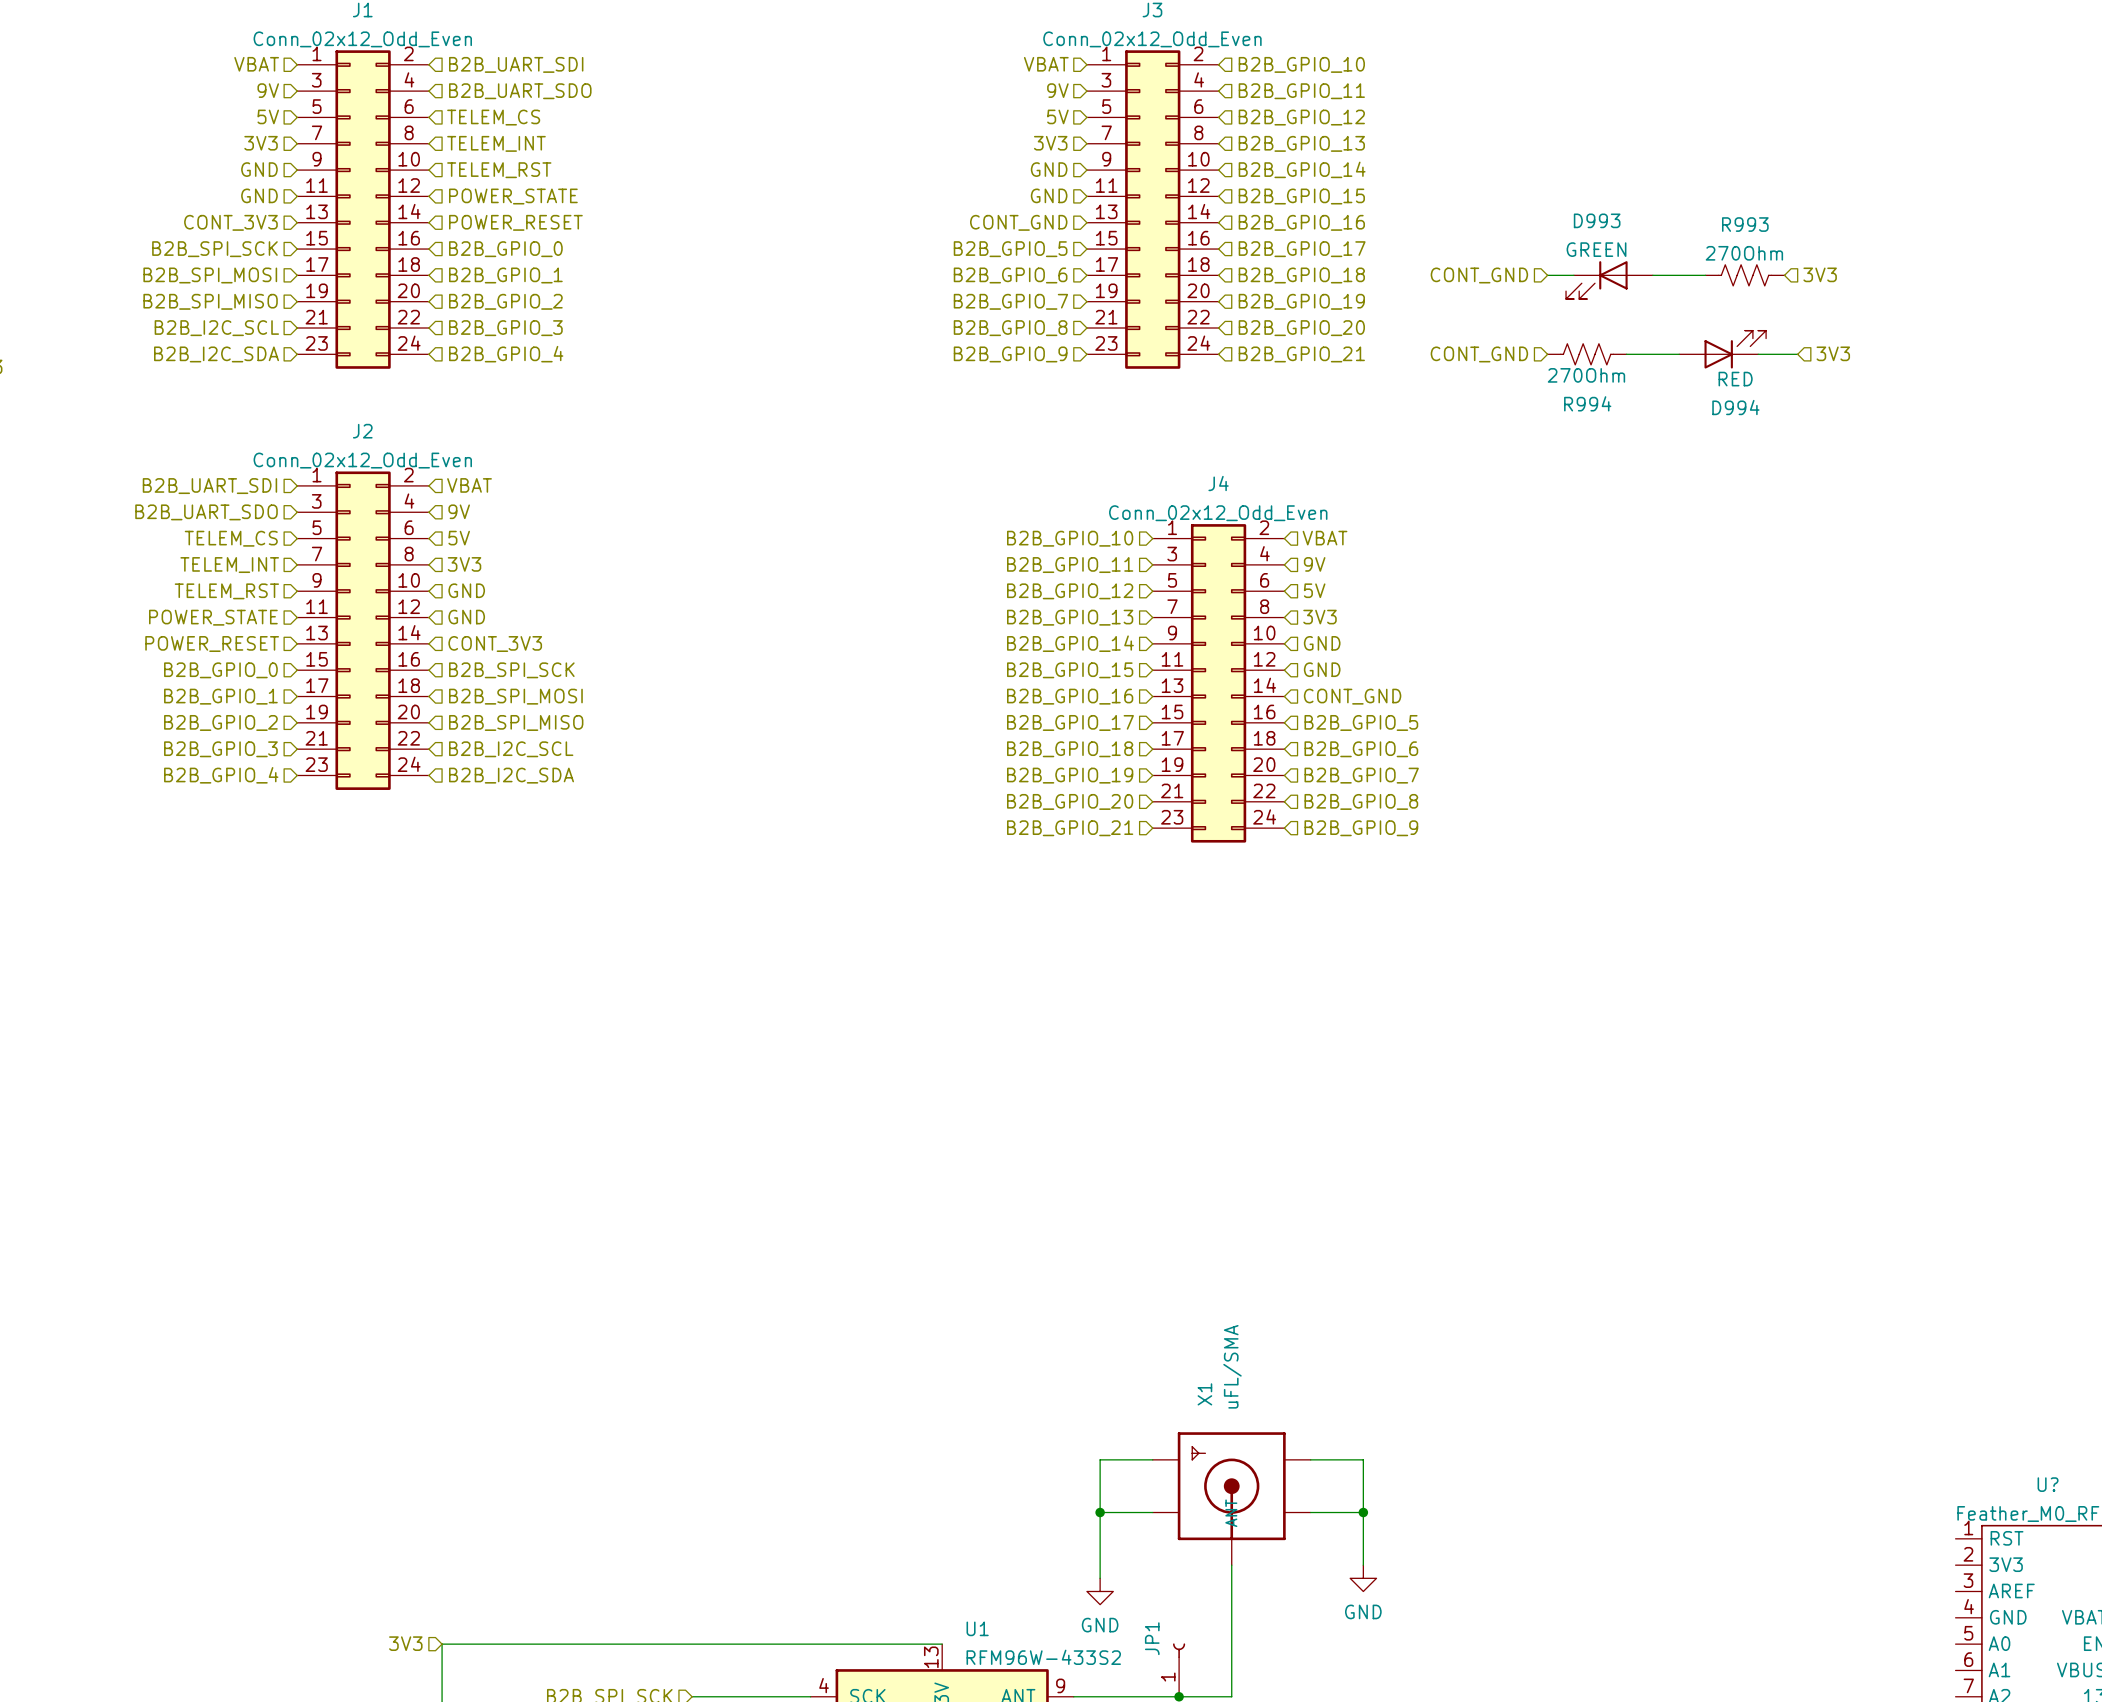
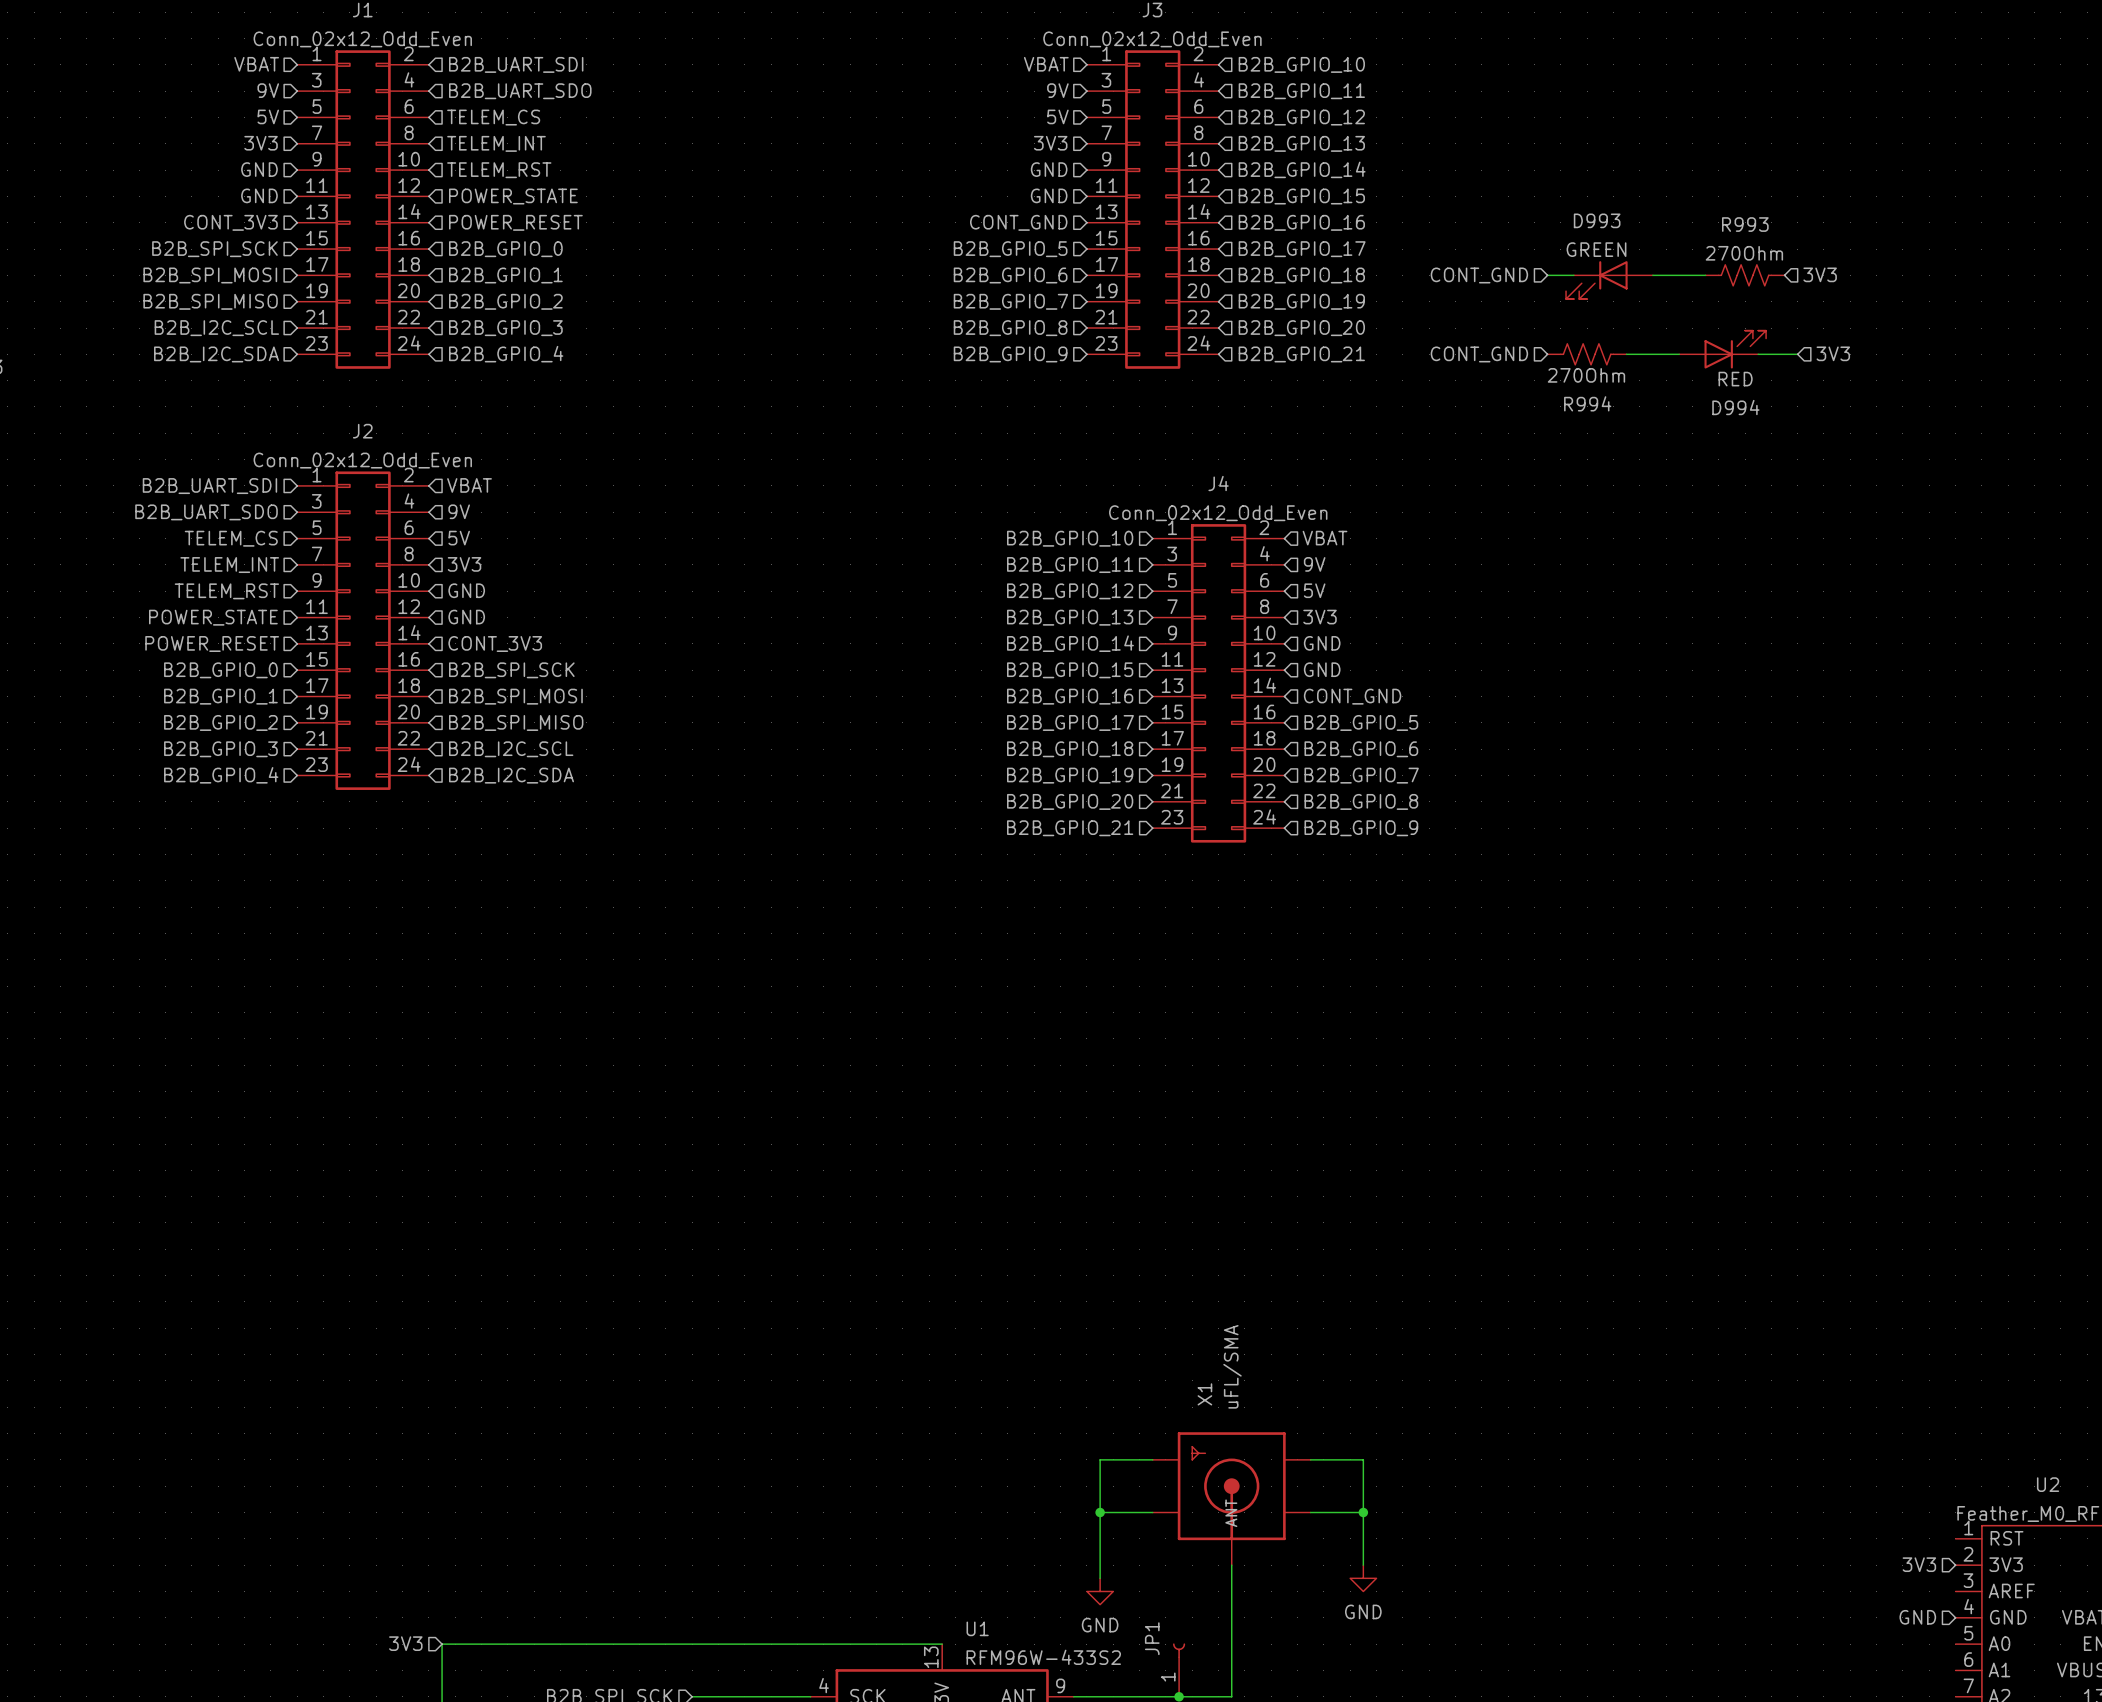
U? name: U? (2048, 1484) -> U2 (2048, 1484)
hierarchical label: none -> 3V3 (1919, 1564)
hierarchical label: none -> GND (1917, 1617)

